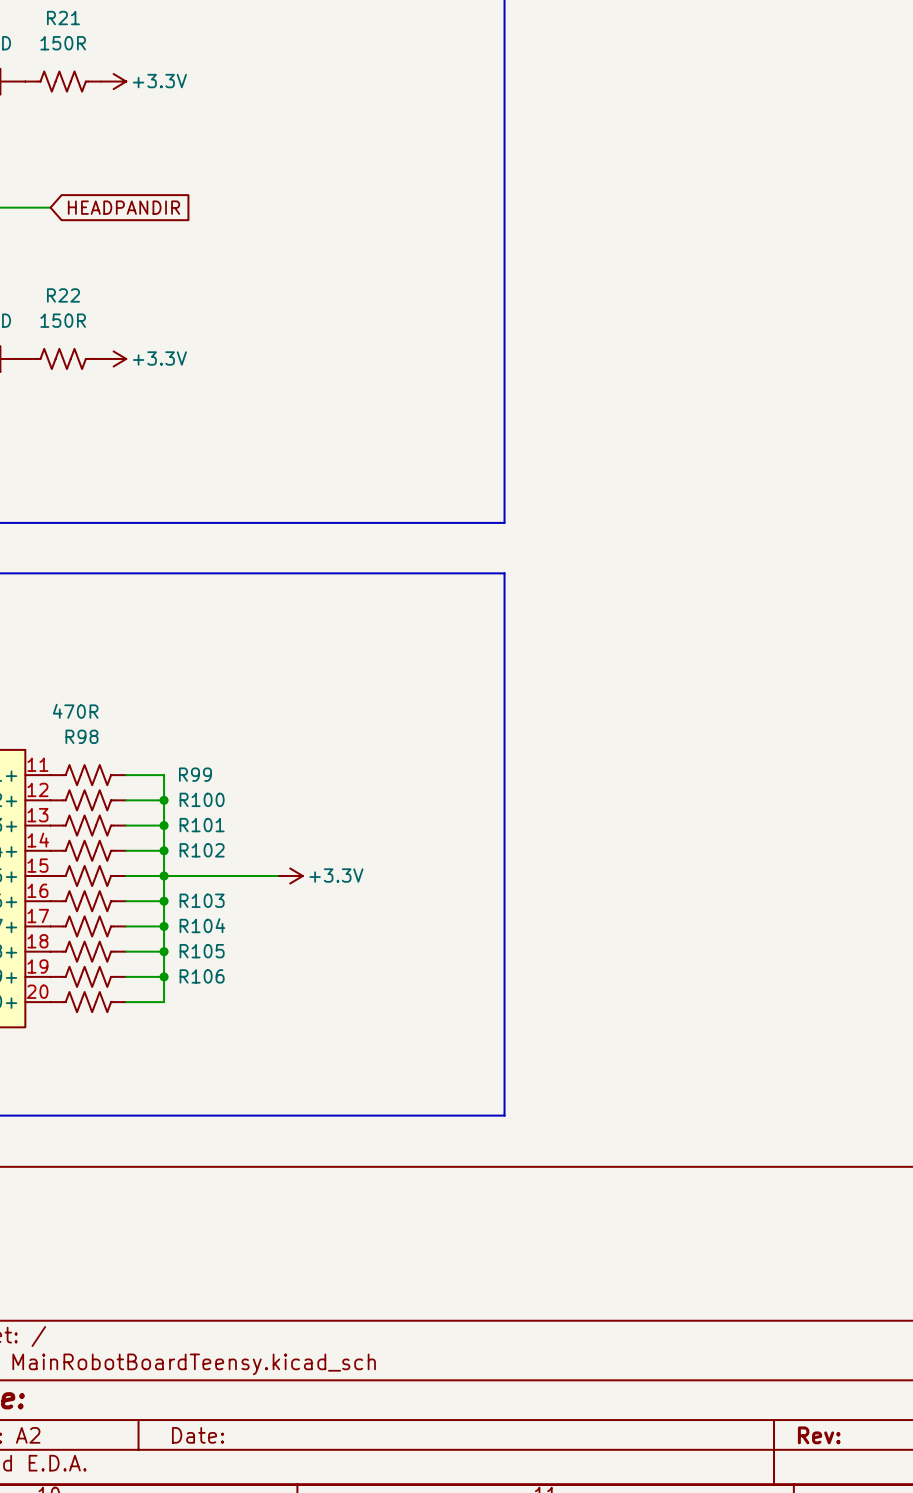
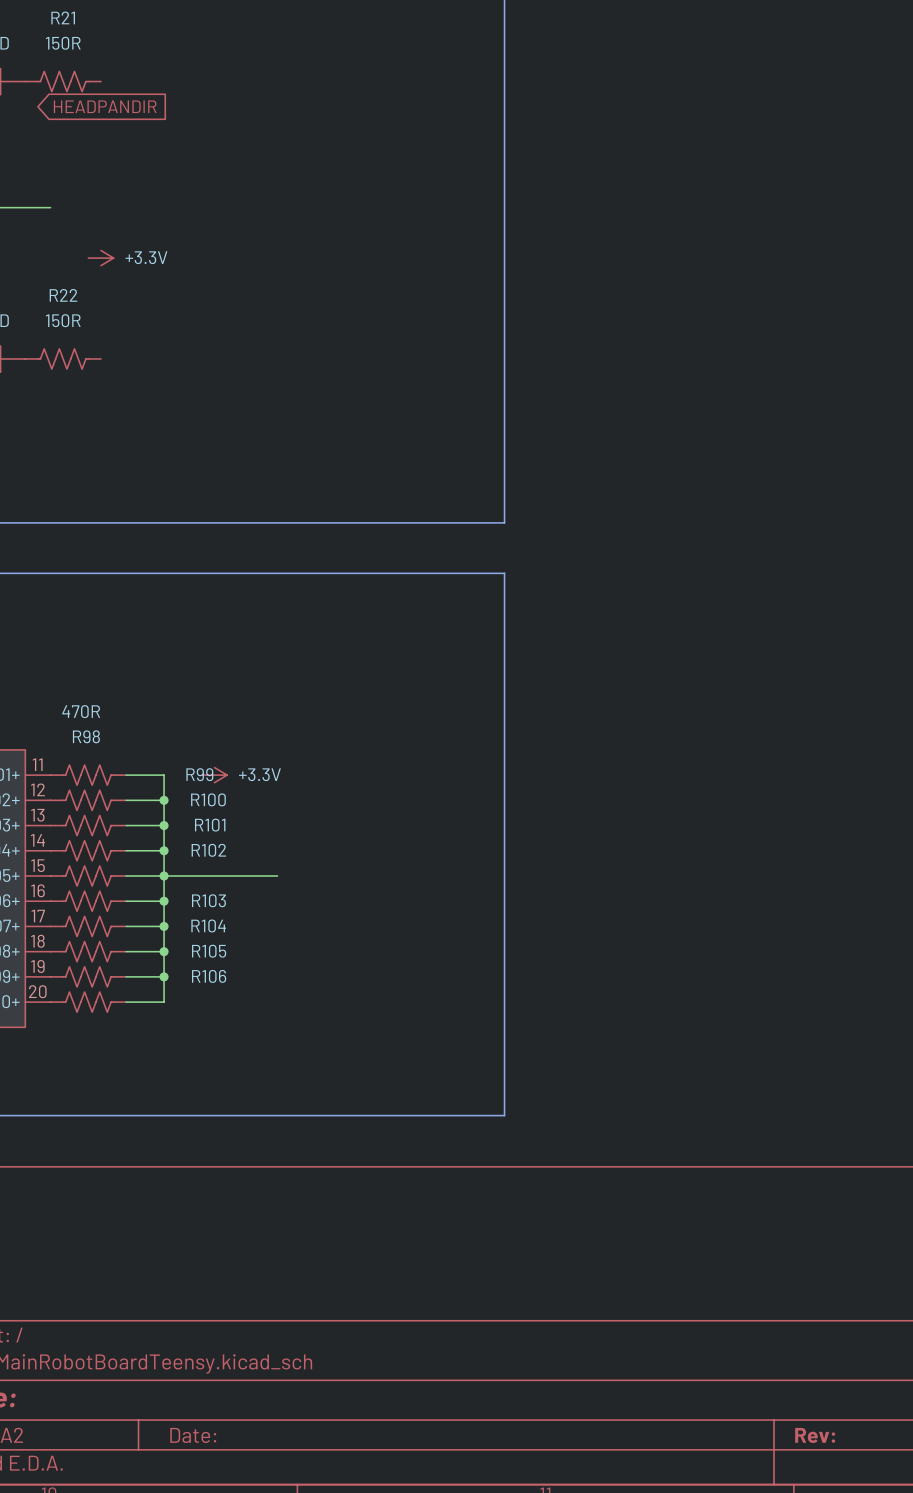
power symbol: +3.3V (113, 81) -> none
global label position: HEADPANDIR (123, 207) -> HEADPANDIR (105, 106)
power symbol: none -> +3.3V (100, 258)
power symbol: +3.3V (113, 358) -> none
power symbol position: +3.3V (290, 876) -> +3.3V (214, 775)

